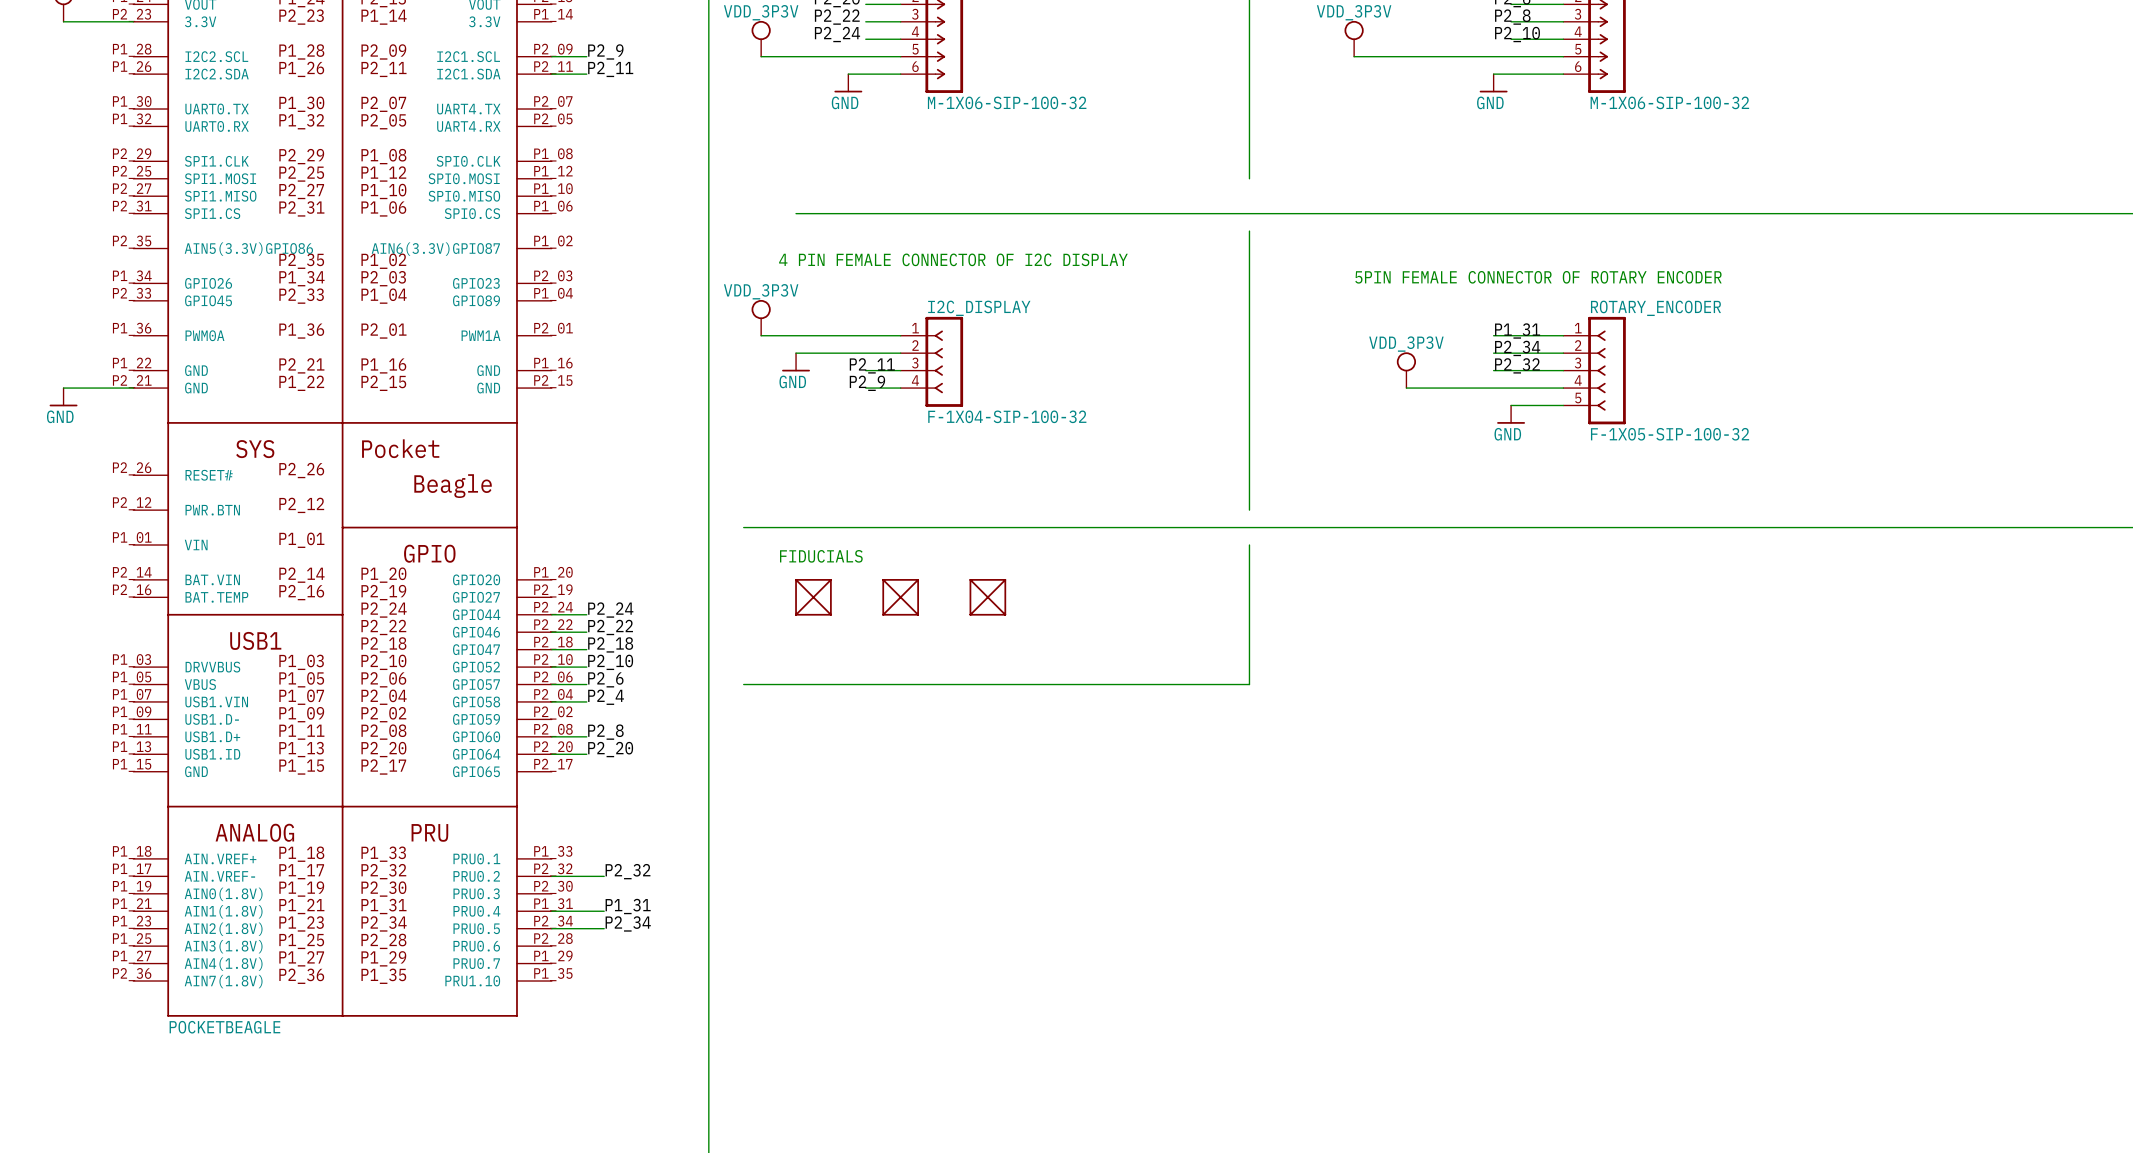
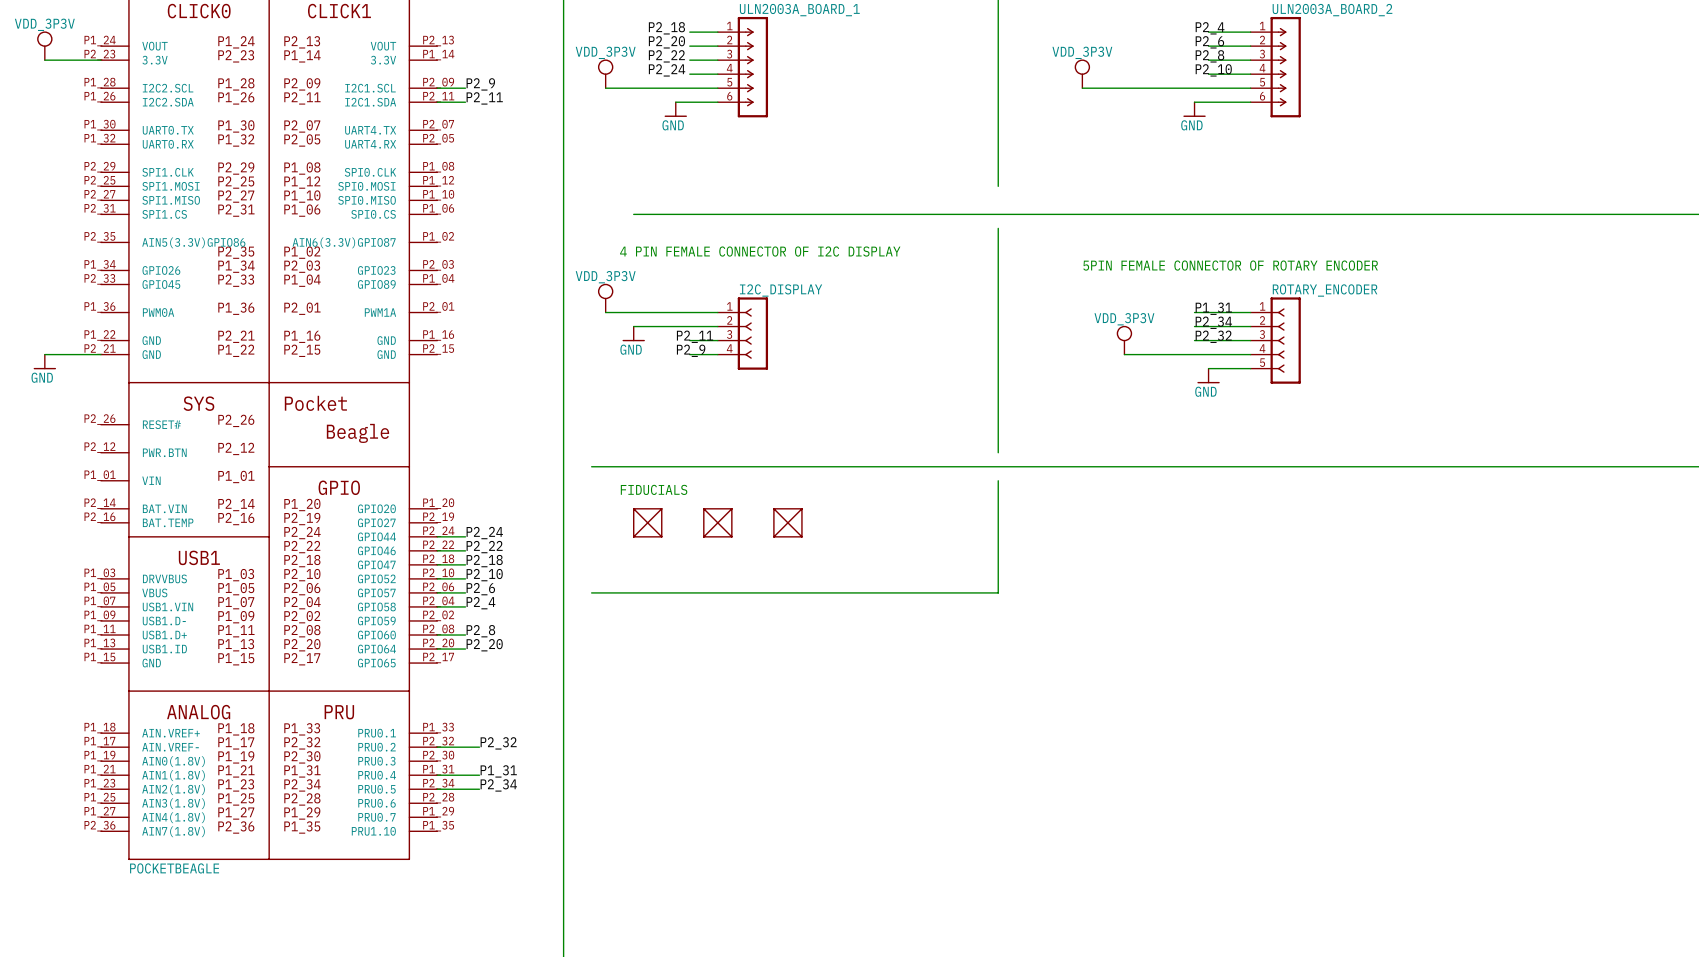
ULN2003A_BOARD_1 value: M-1X06-SIP-100-32 (1007, 102) -> none
ULN2003A_BOARD_2 value: M-1X06-SIP-100-32 (1669, 102) -> none
I2C_DISPLAY value: F-1X04-SIP-100-32 (1007, 416) -> none
ROTARY_ENCODER value: F-1X05-SIP-100-32 (1670, 434) -> none

